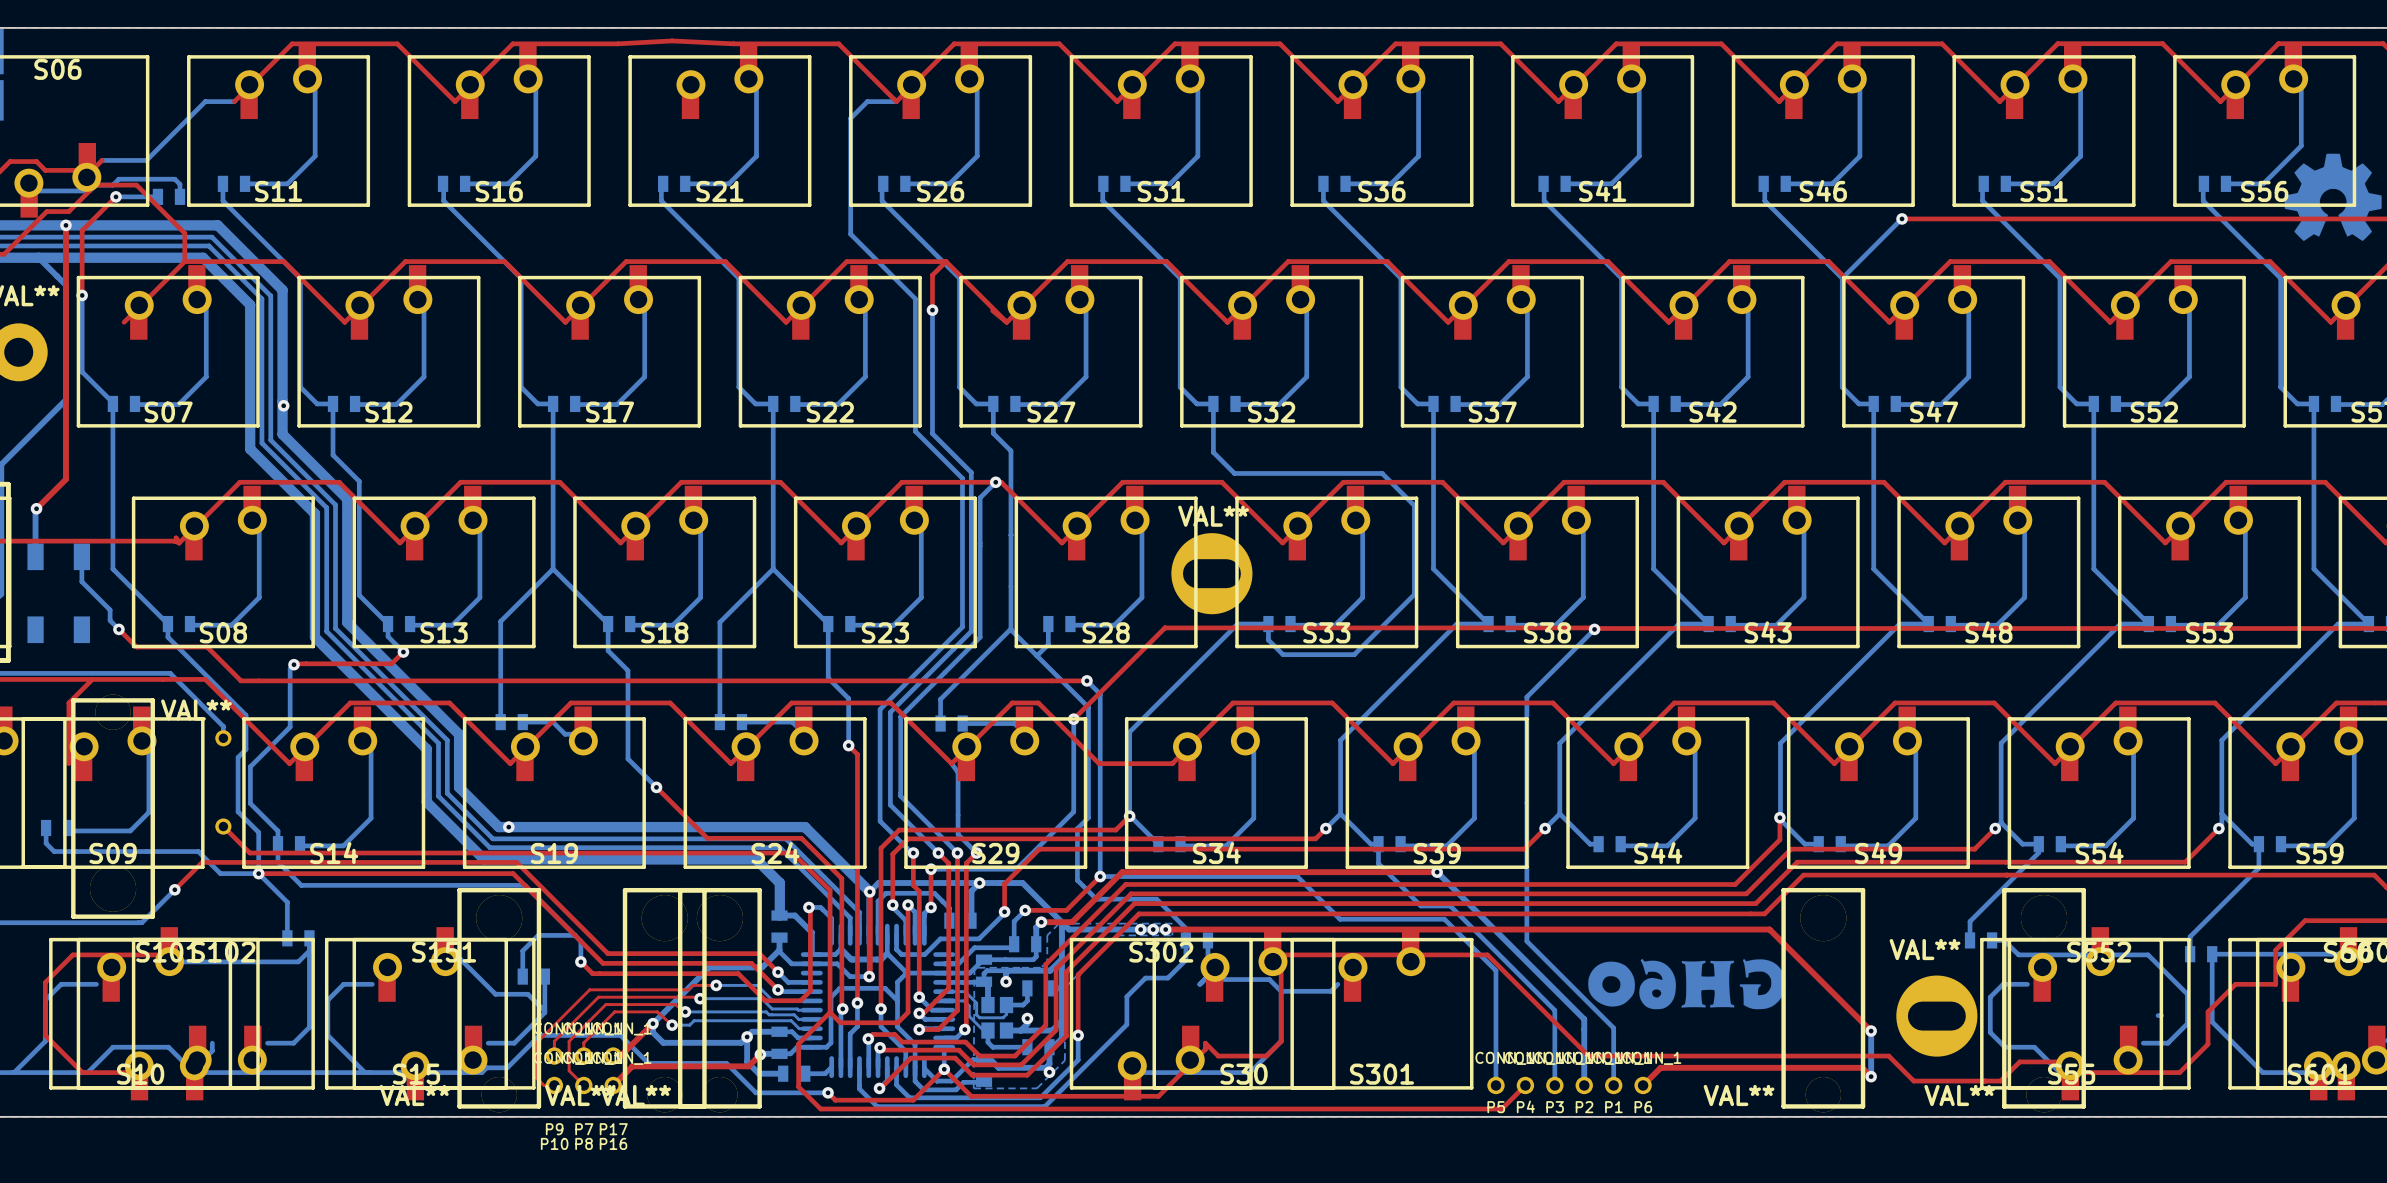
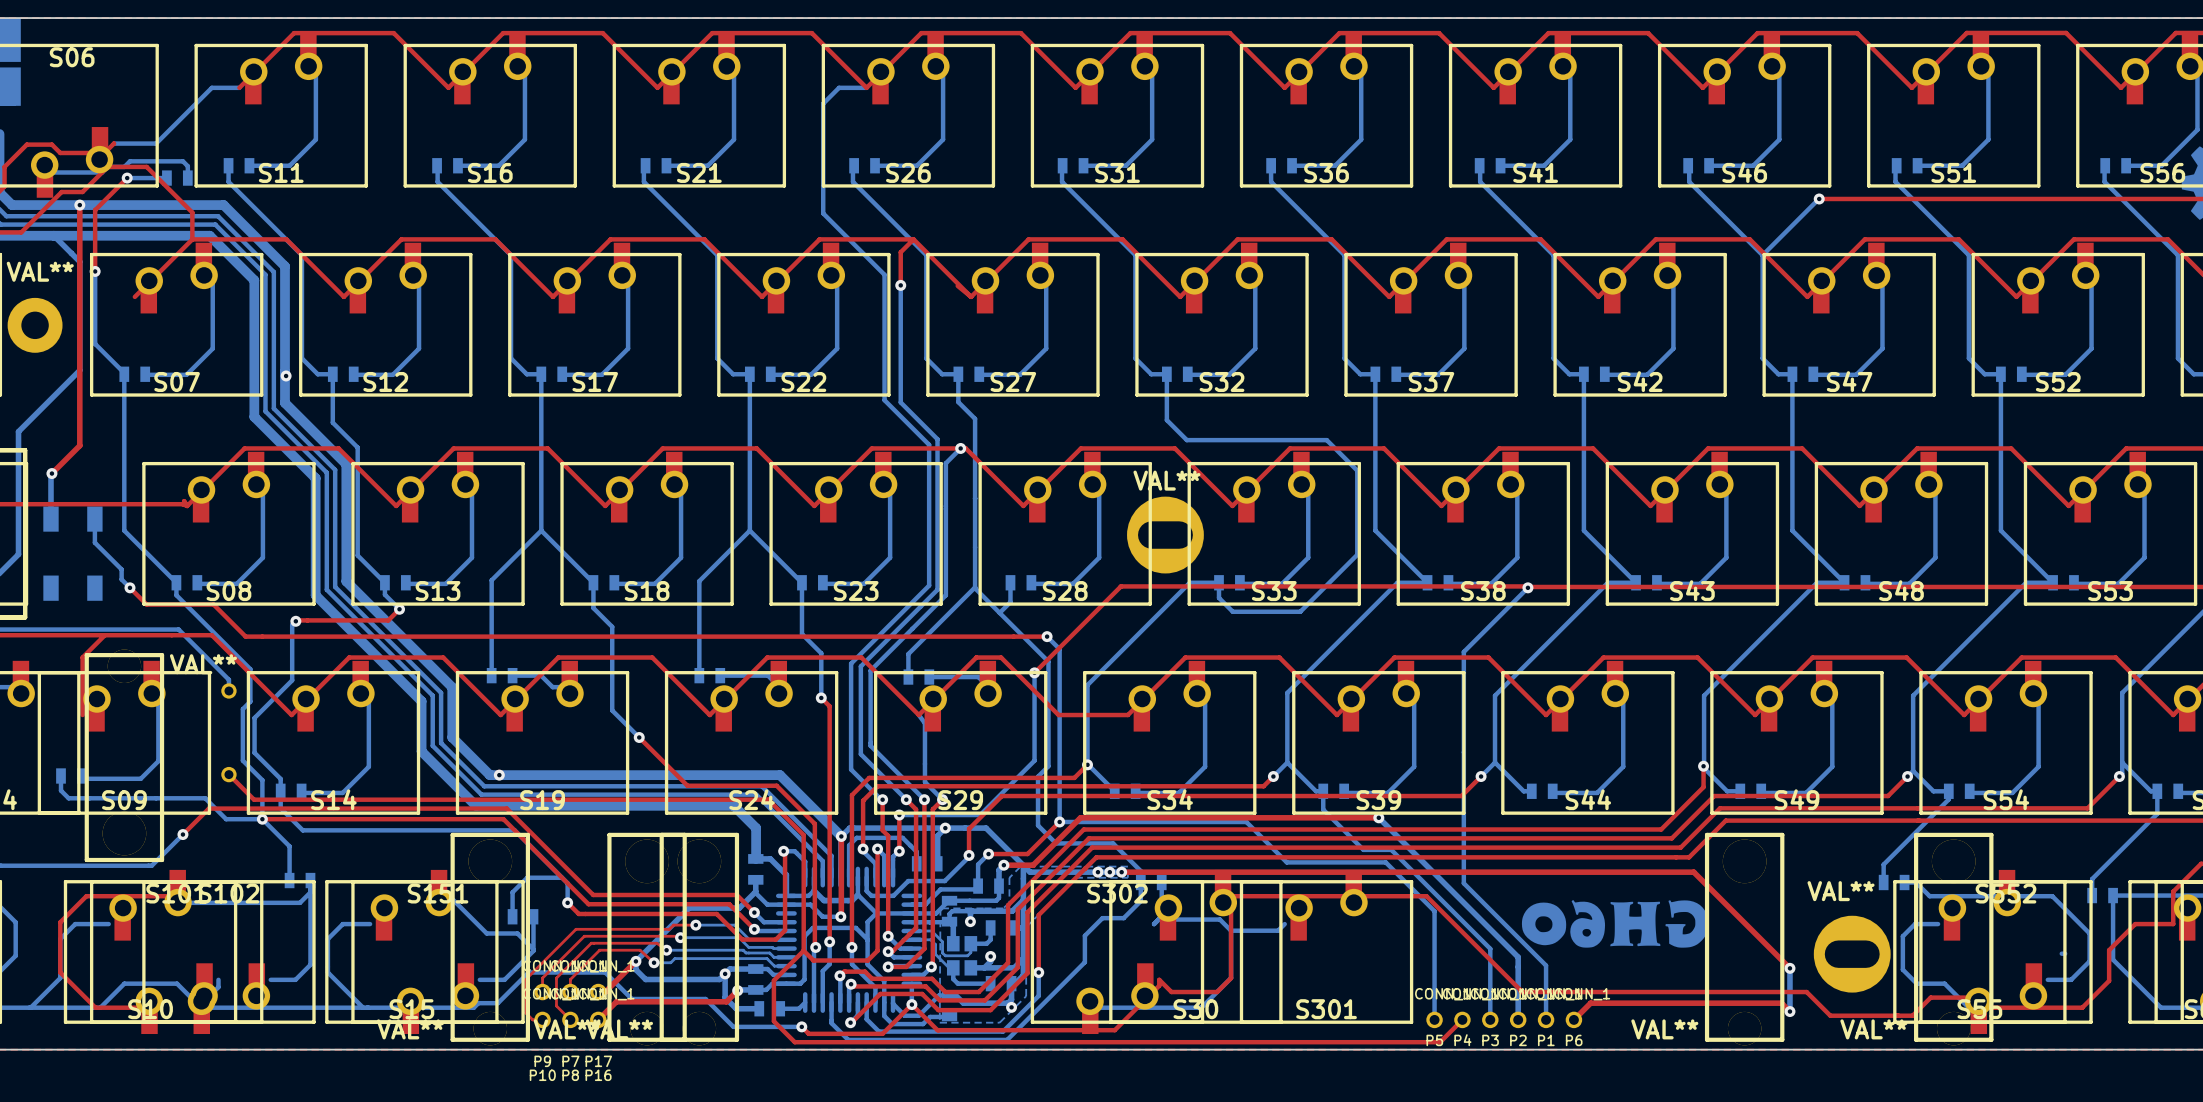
top track: (618, 43) (672, 40) (733, 43) -> (602, 33) (657, 87) (712, 33)

